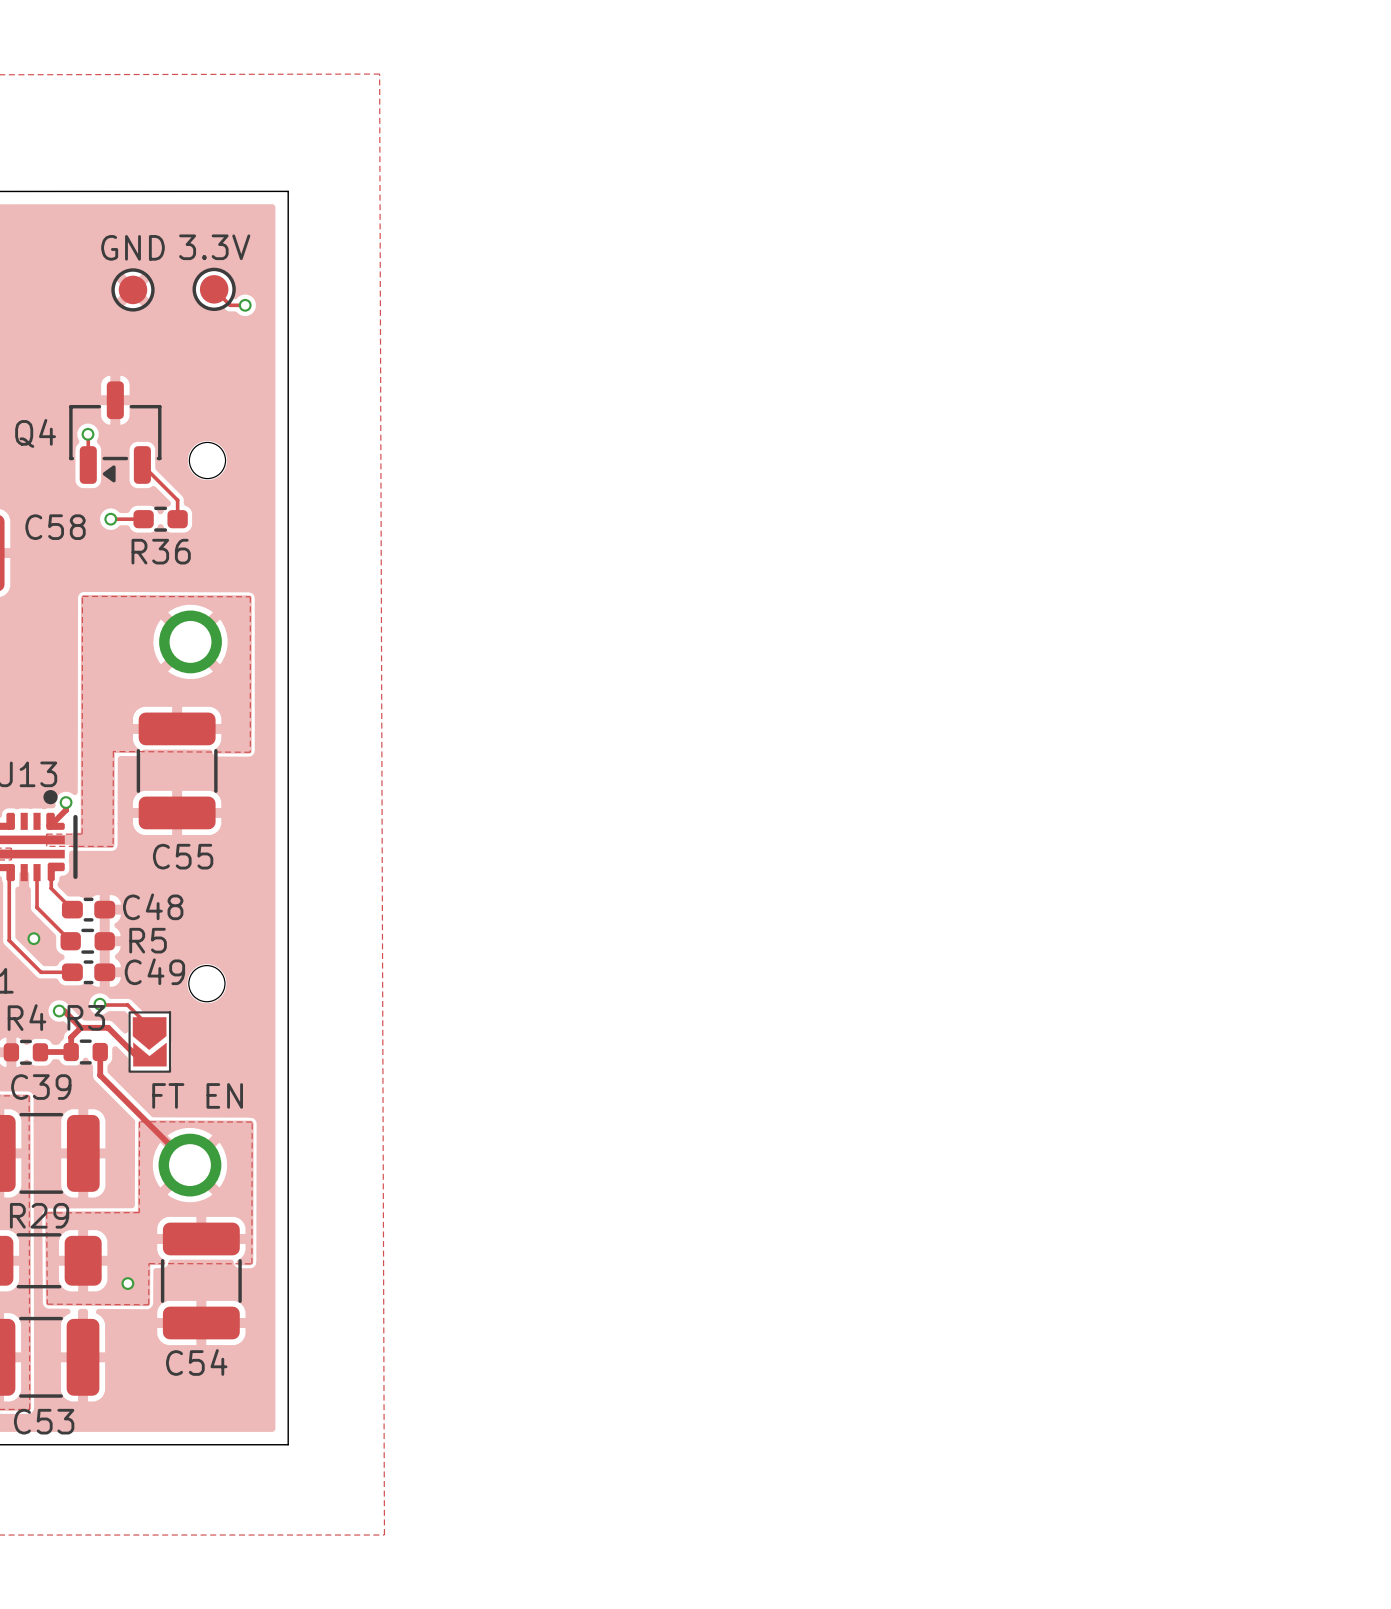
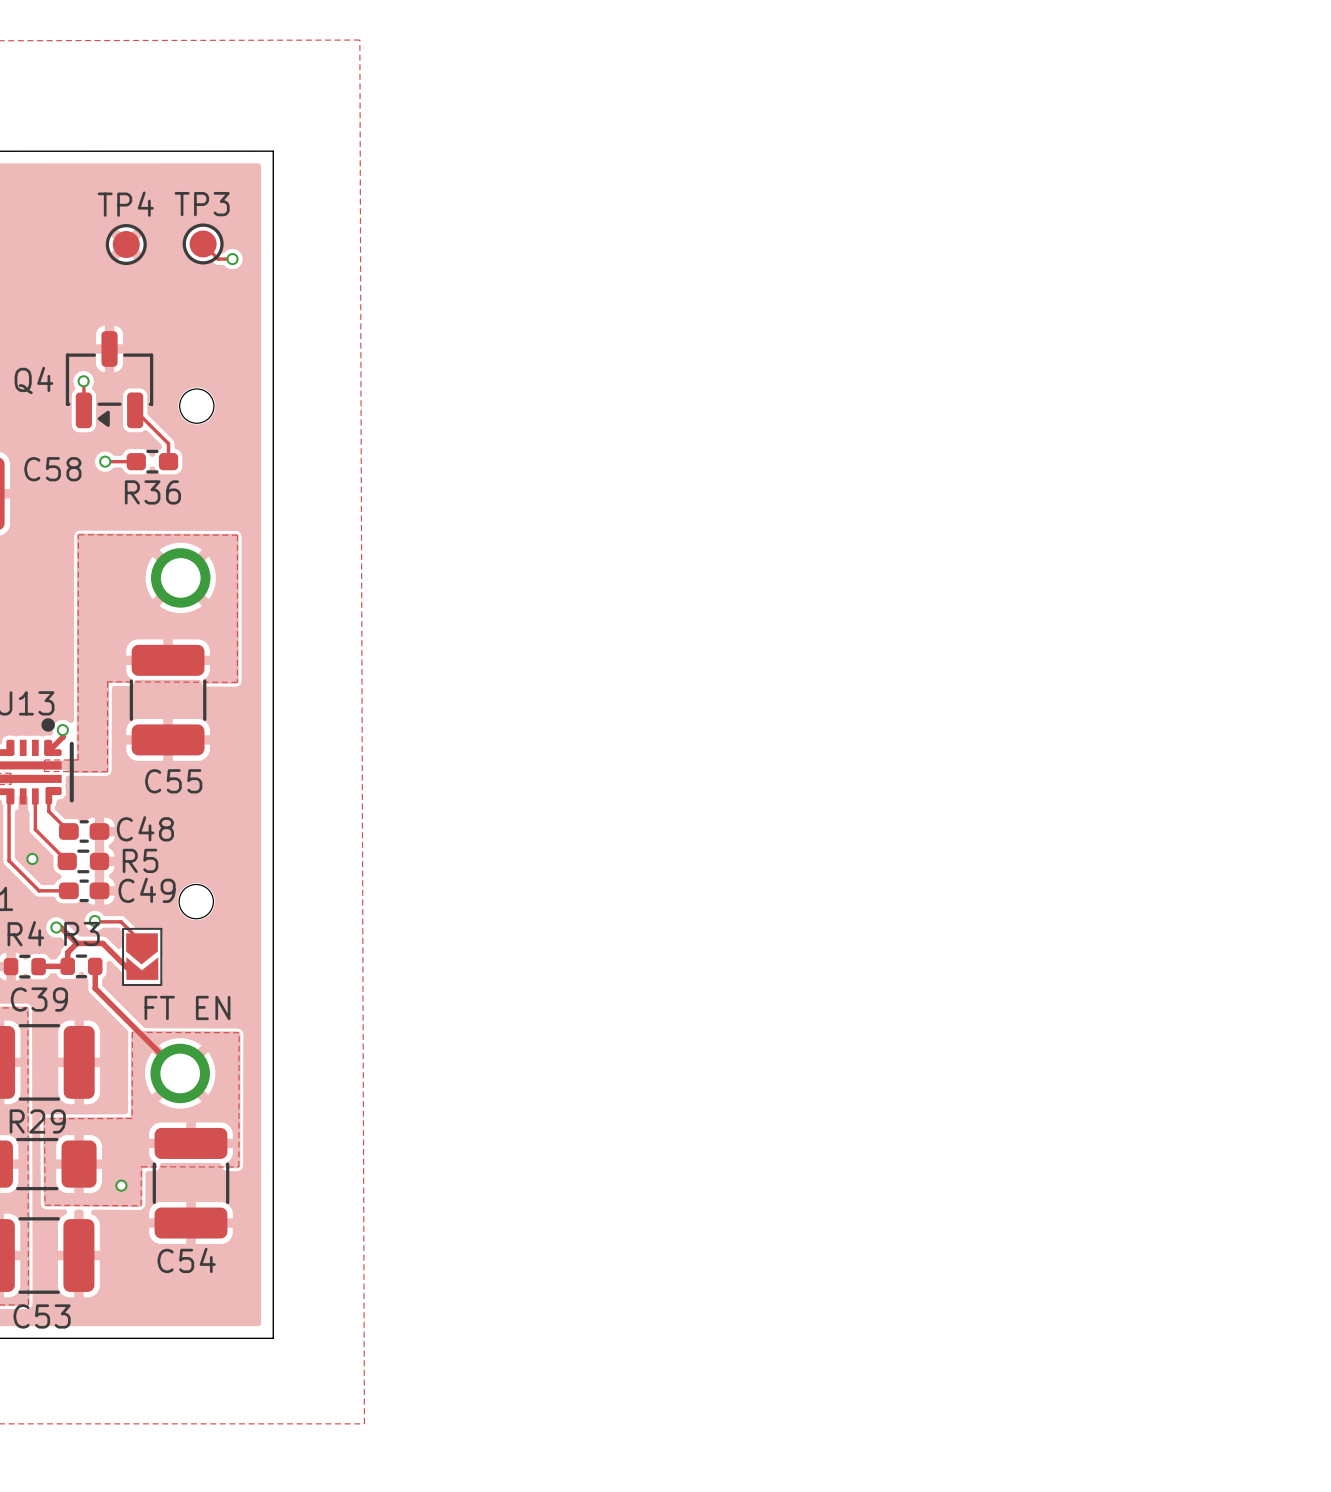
GND name: GND (132, 247) -> TP4 (125, 204)
3.3V name: 3.3V (214, 247) -> TP3 (202, 204)

